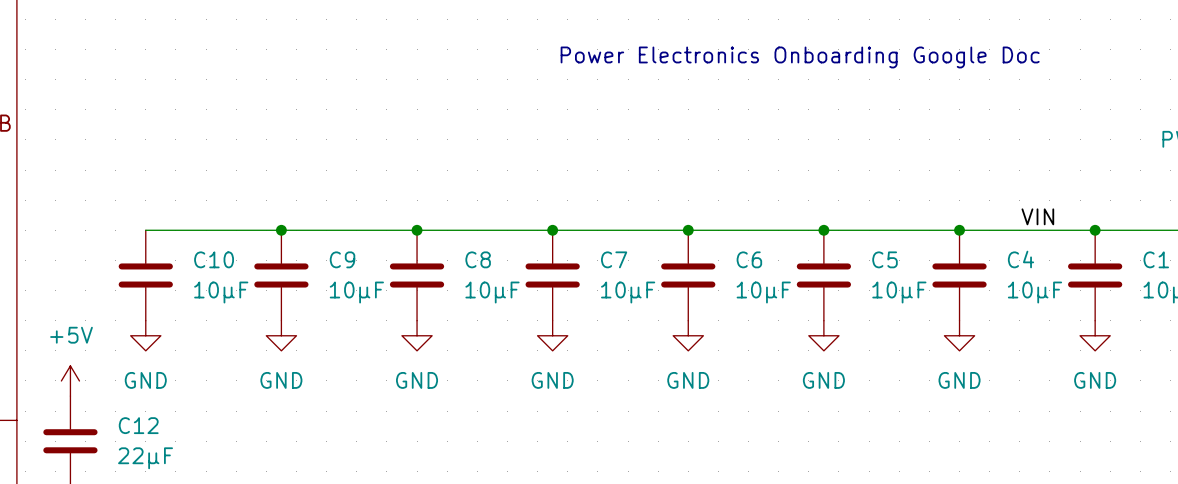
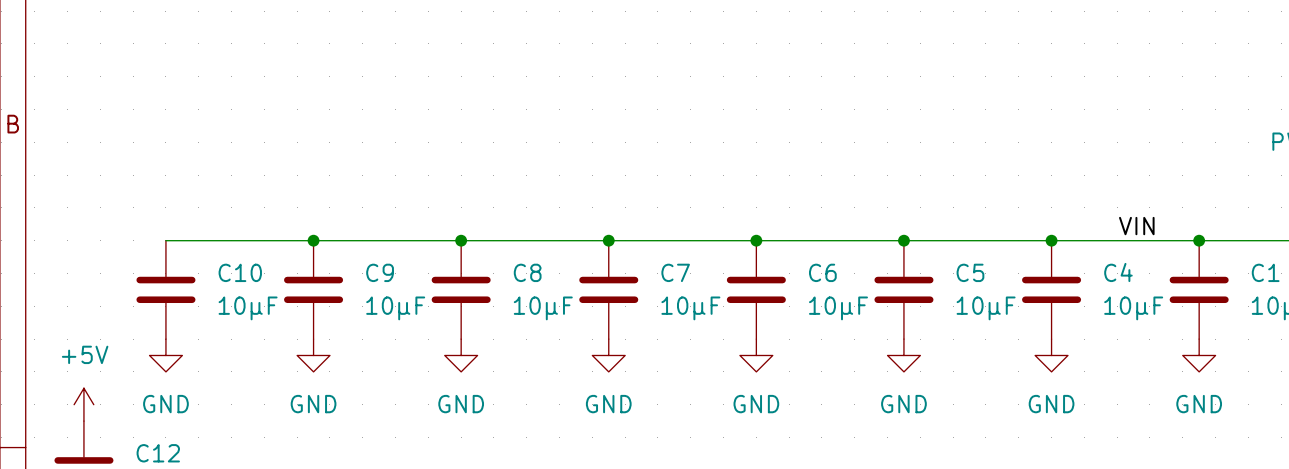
text: Power Electronics Onboarding Google Doc (800, 57) -> none

